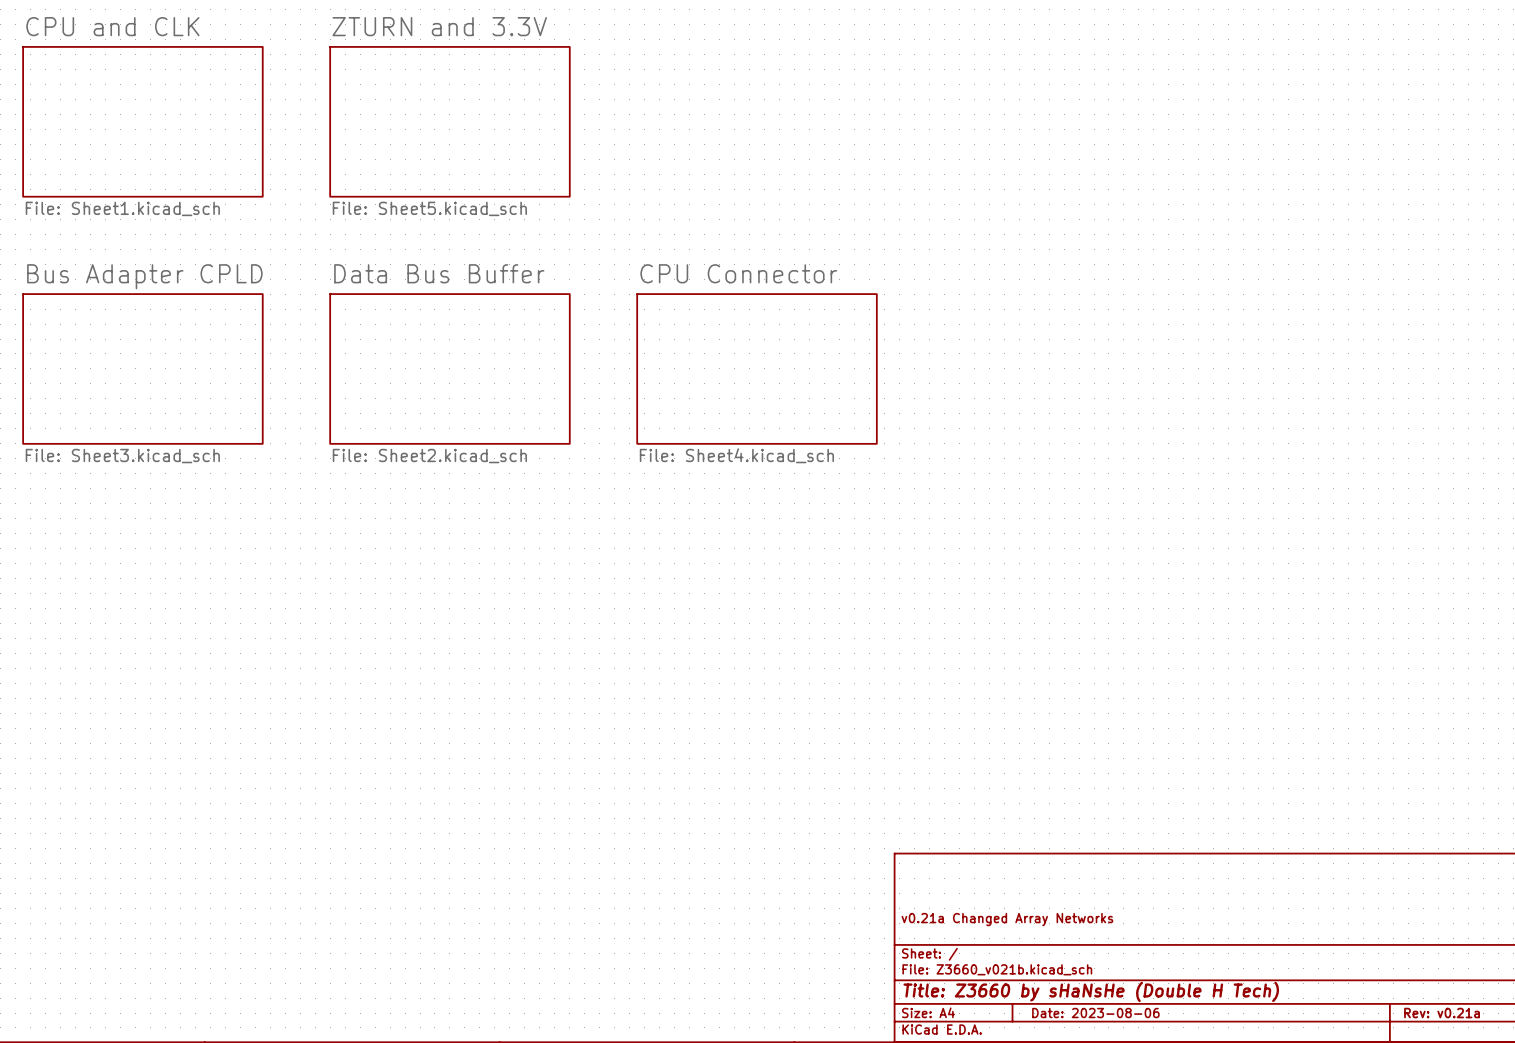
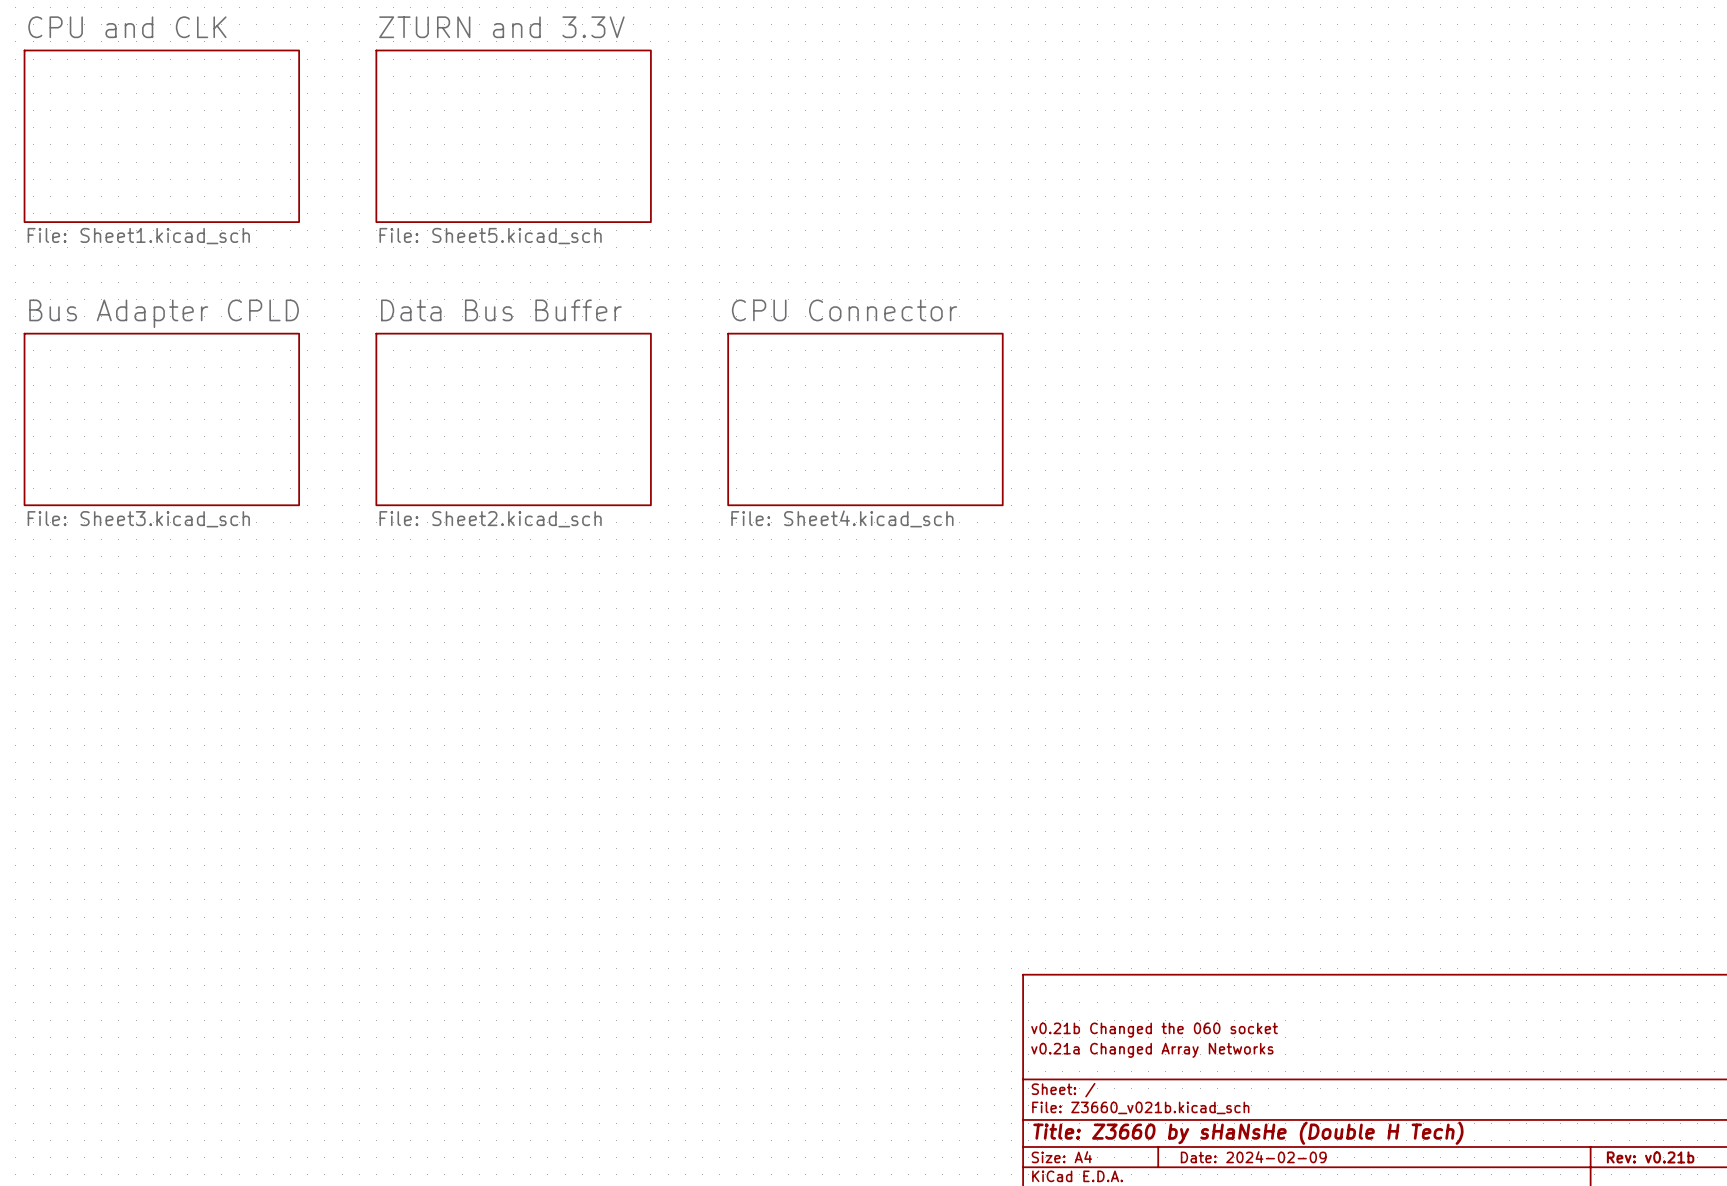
title block: none -> v0.21b Changed the 060 socket (1154, 1030)
title block: Date: 2023-08-06 (1095, 1013) -> Date: 2024-02-09 (1253, 1157)
title block: Rev: v0.21a (1442, 1013) -> Rev: v0.21b (1650, 1157)

